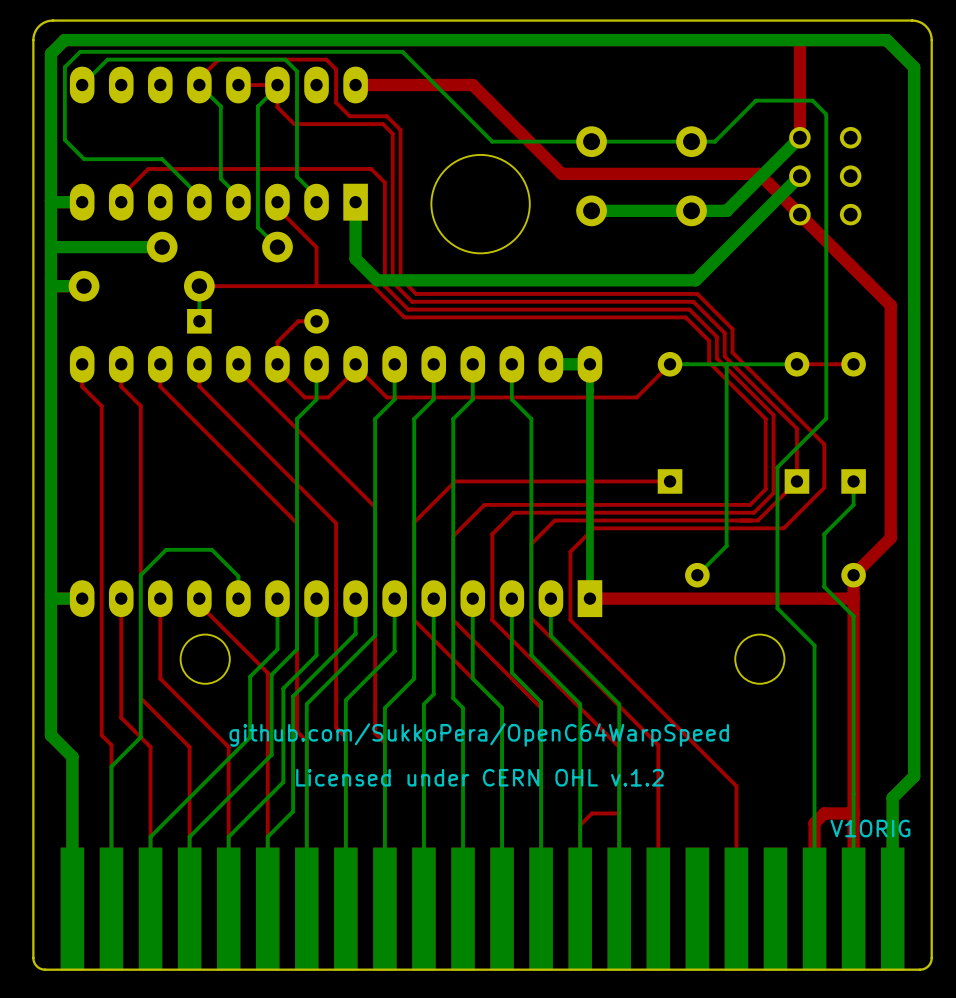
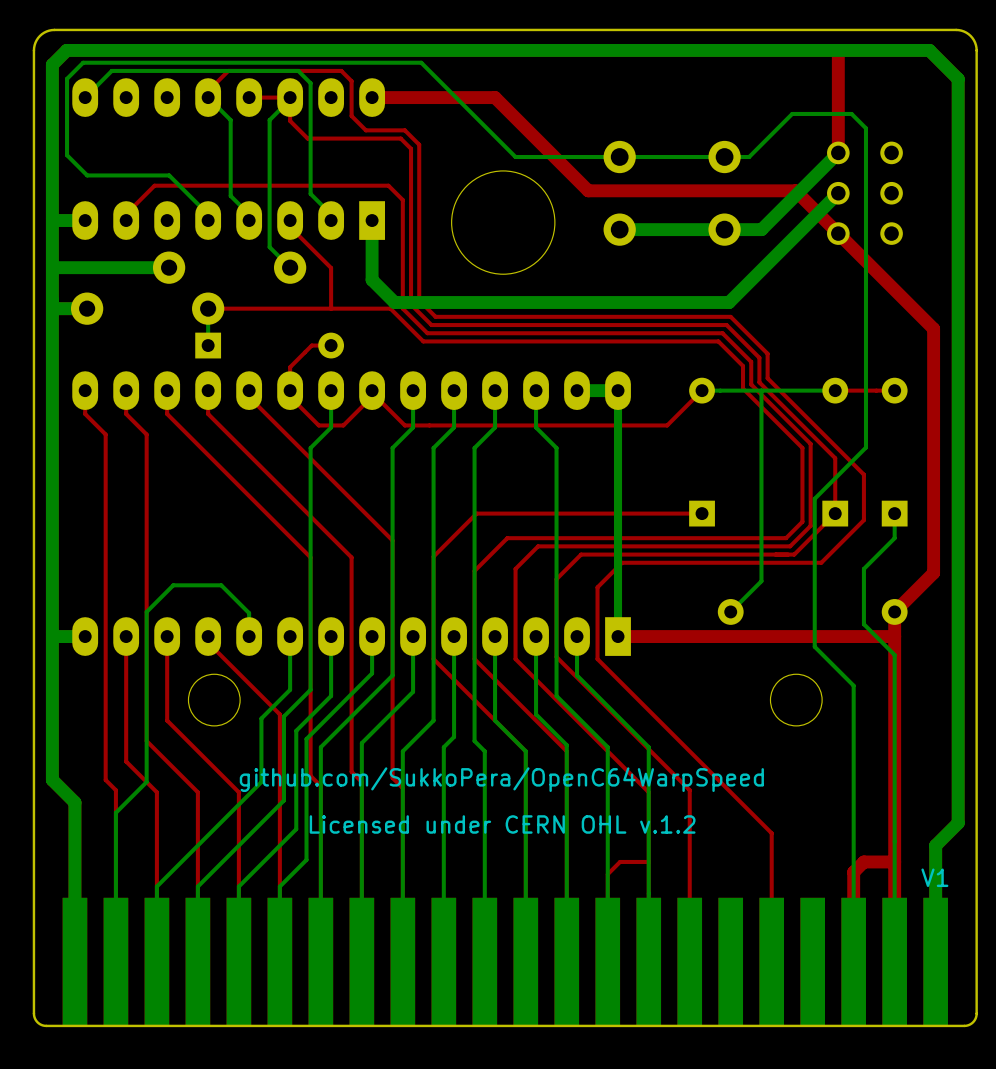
text: V1ORIG (870, 828) -> none
text: none -> V1 (934, 877)

